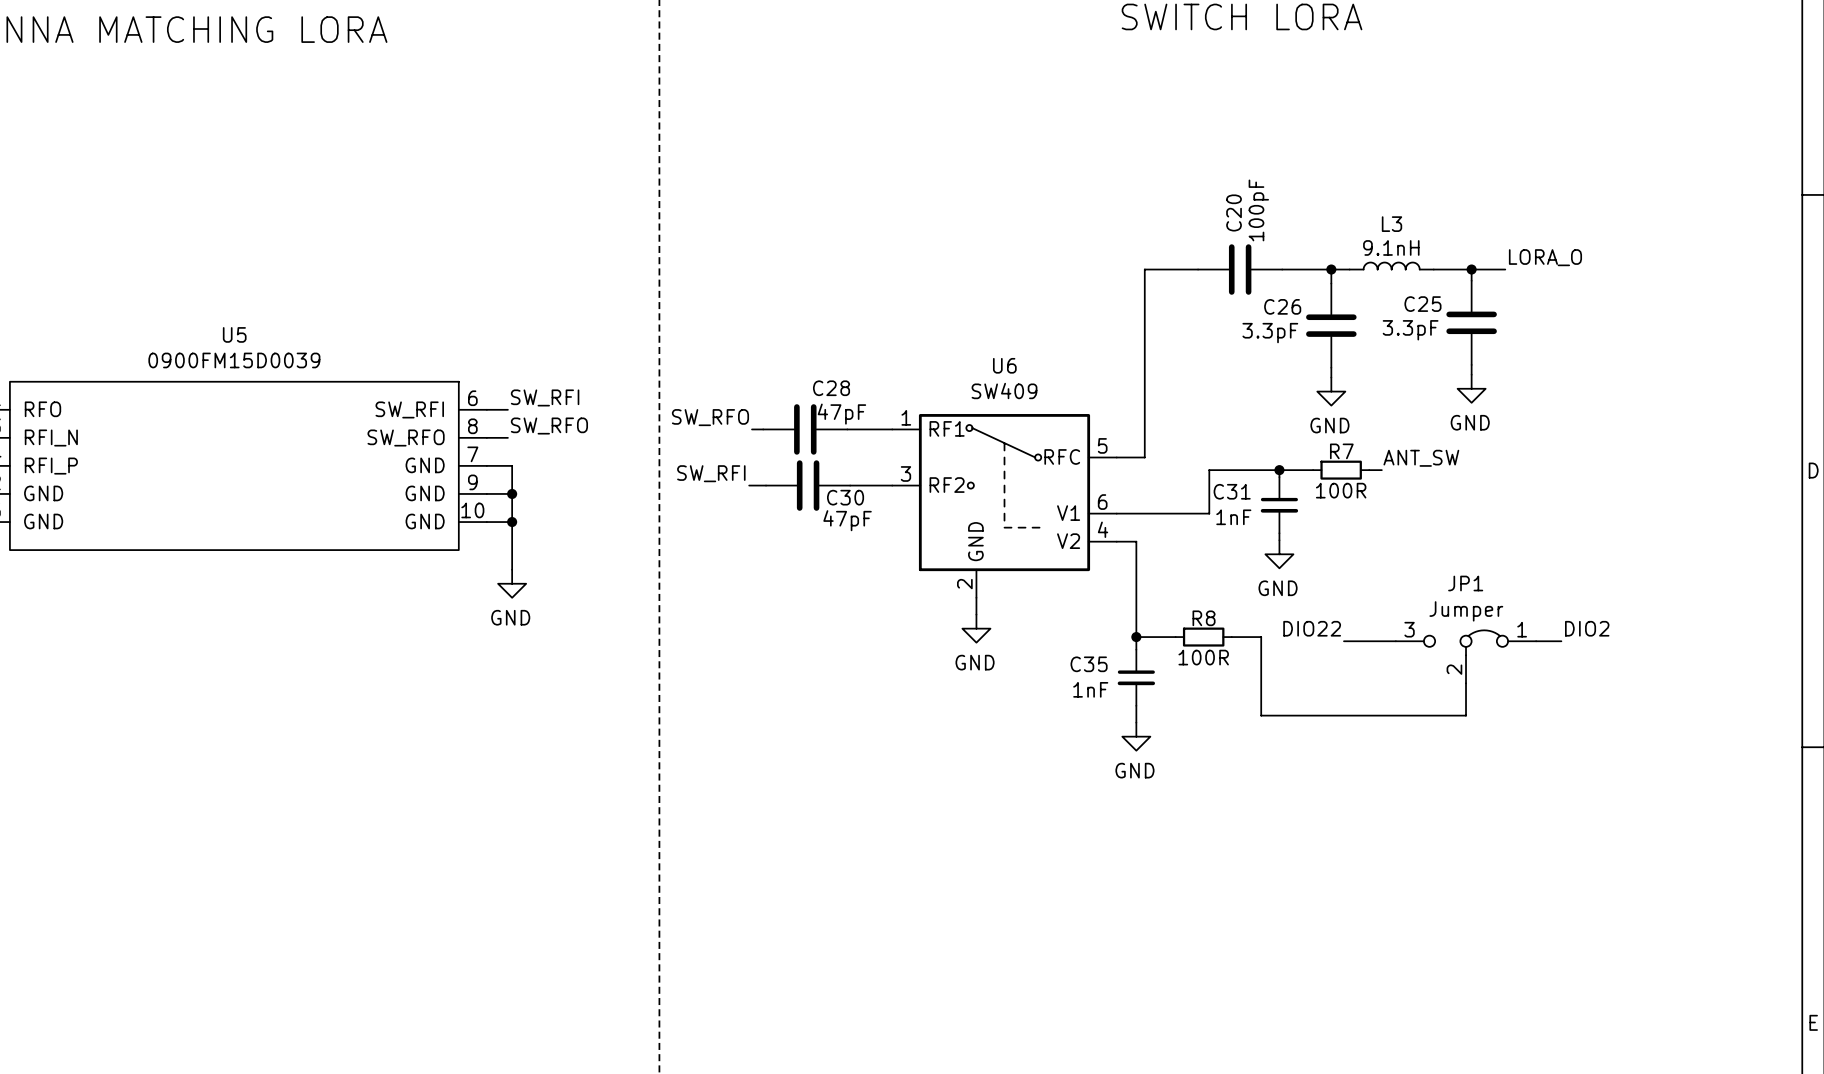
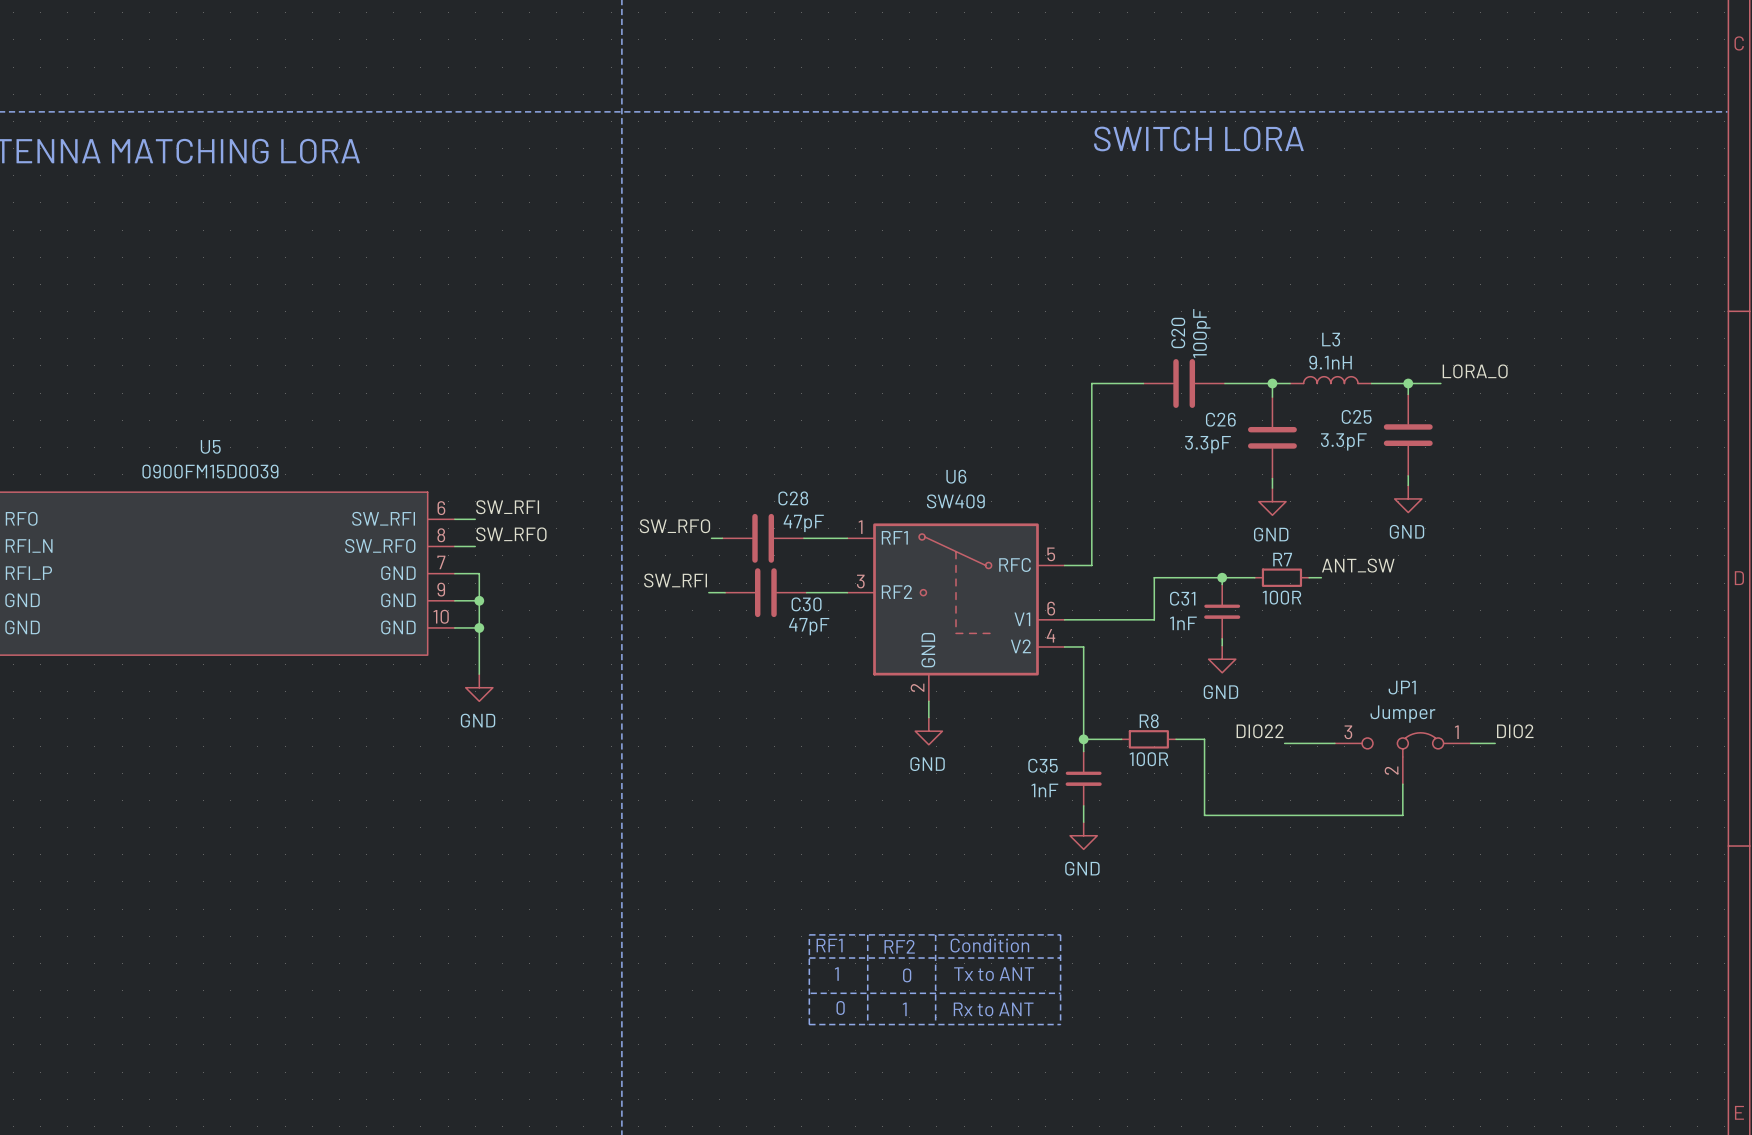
line: none -> (809, 934) (1060, 934) (1060, 1024) (809, 1024) (809, 934)
line: none -> (867, 934) (867, 1024)
line: none -> (935, 934) (935, 1023)
text: none -> RF1 (829, 945)
text: none -> Condition (989, 945)
text: none -> RF2 (899, 946)
line: none -> (809, 958) (1060, 958)
text: none -> 1 (836, 974)
text: none -> Tx to ANT (994, 974)
text: none -> 0 (907, 975)
line: none -> (810, 993) (1060, 993)
text: none -> 0 (840, 1008)
text: none -> 1 (904, 1009)
text: none -> Rx to ANT (993, 1009)

